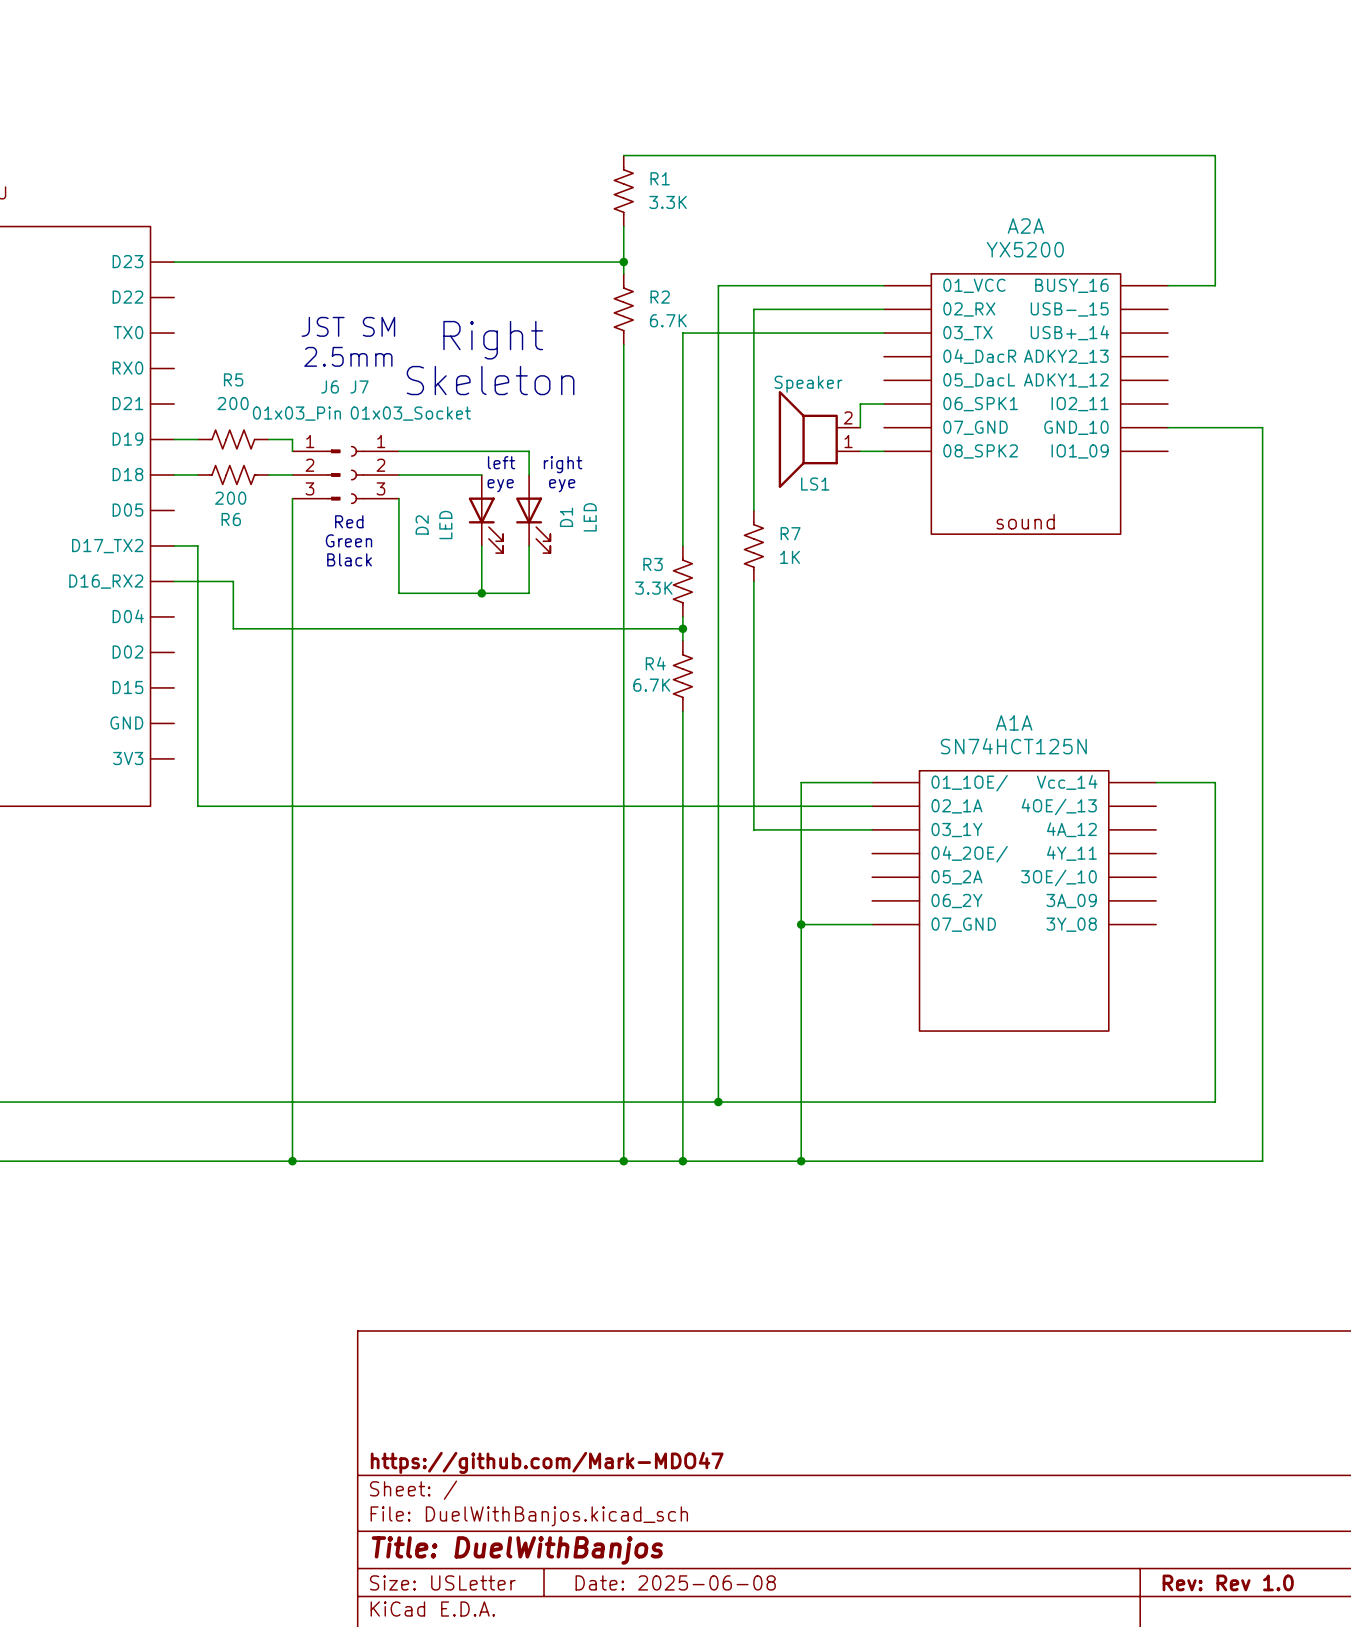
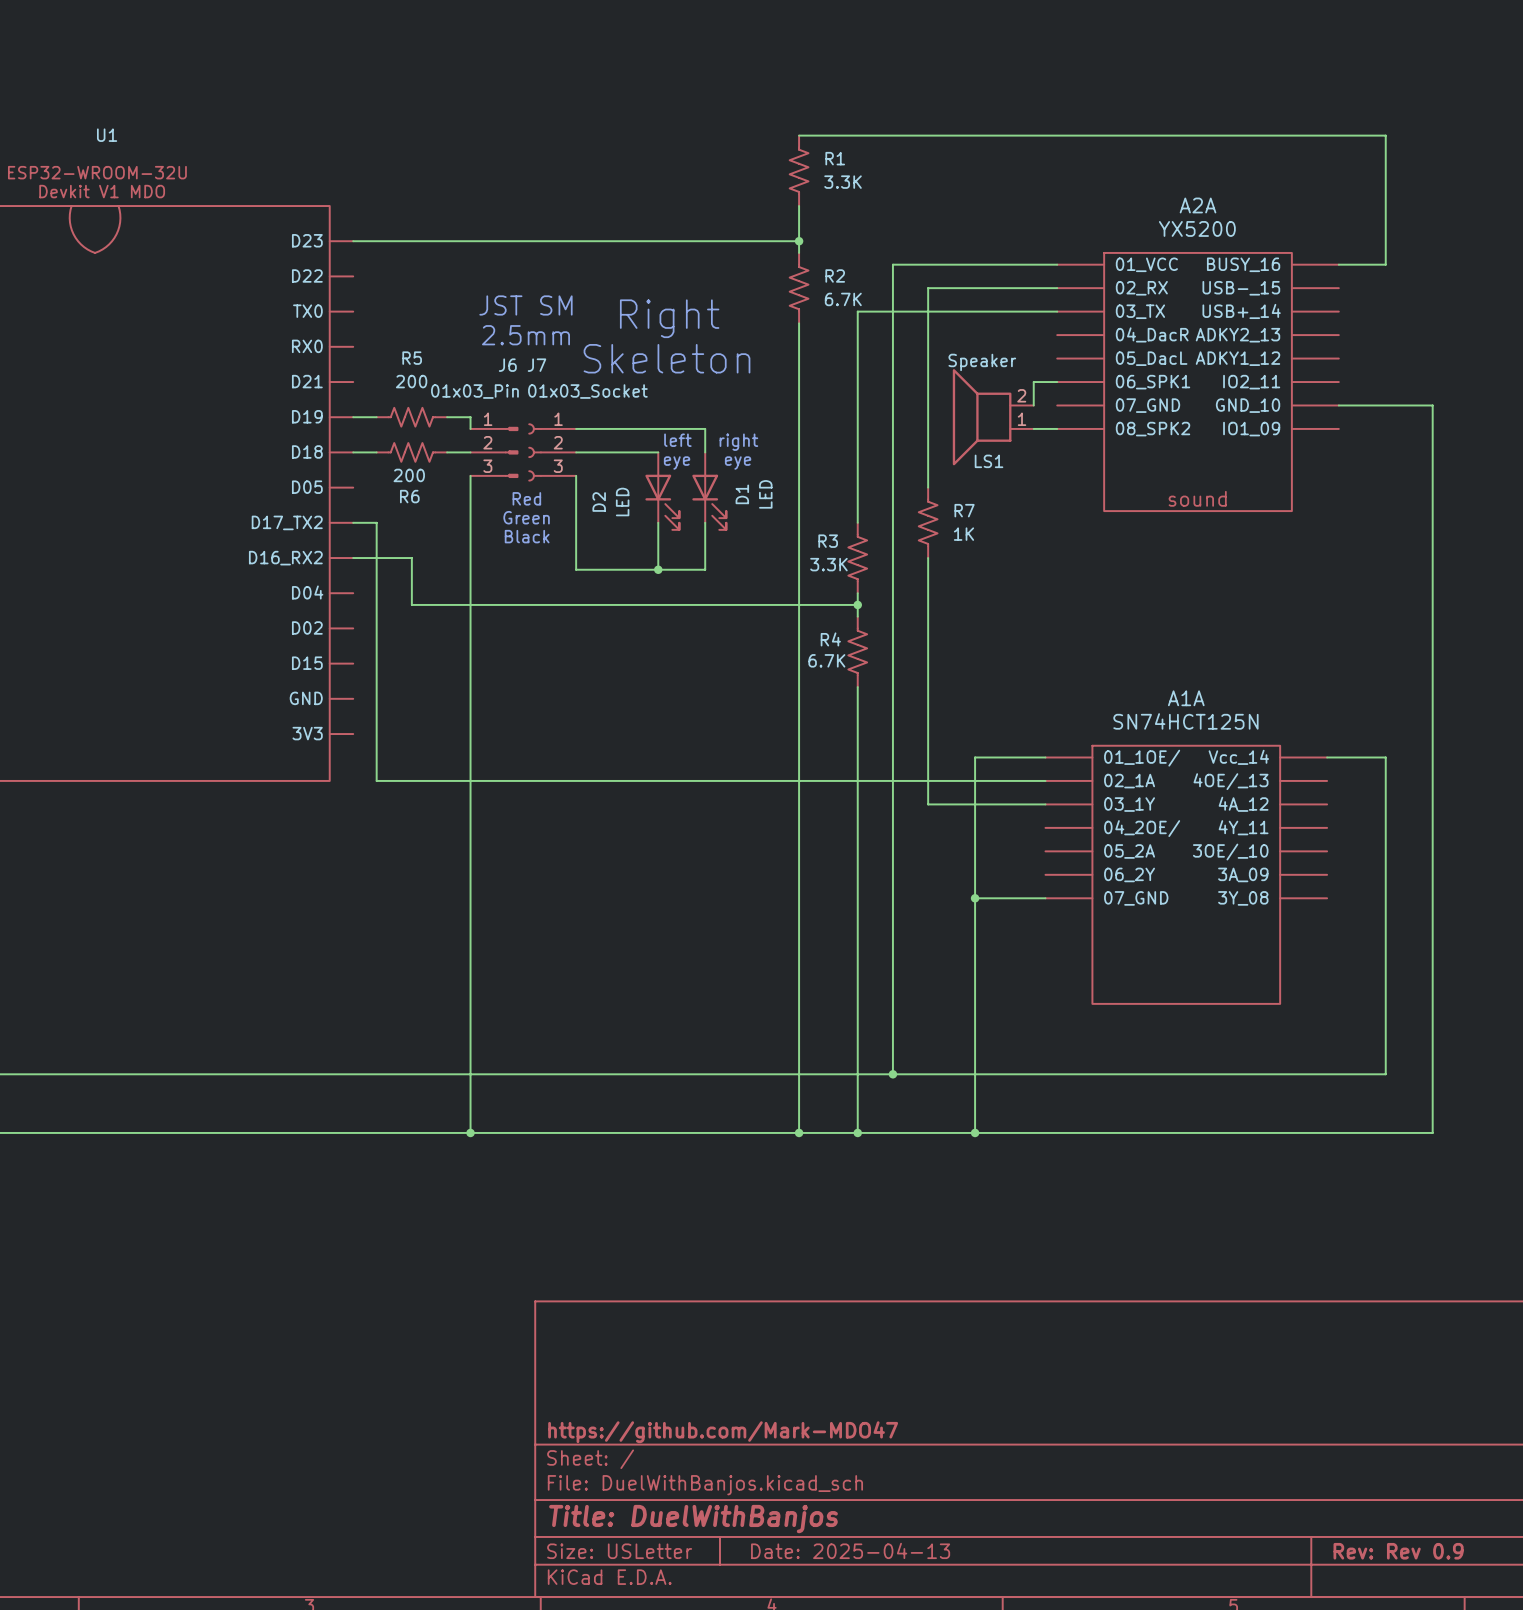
title block: Date: 2025-06-08 (675, 1582) -> Date: 2025-04-13 (850, 1550)
title block: Rev: Rev 1.0 (1228, 1582) -> Rev: Rev 0.9 (1398, 1551)

